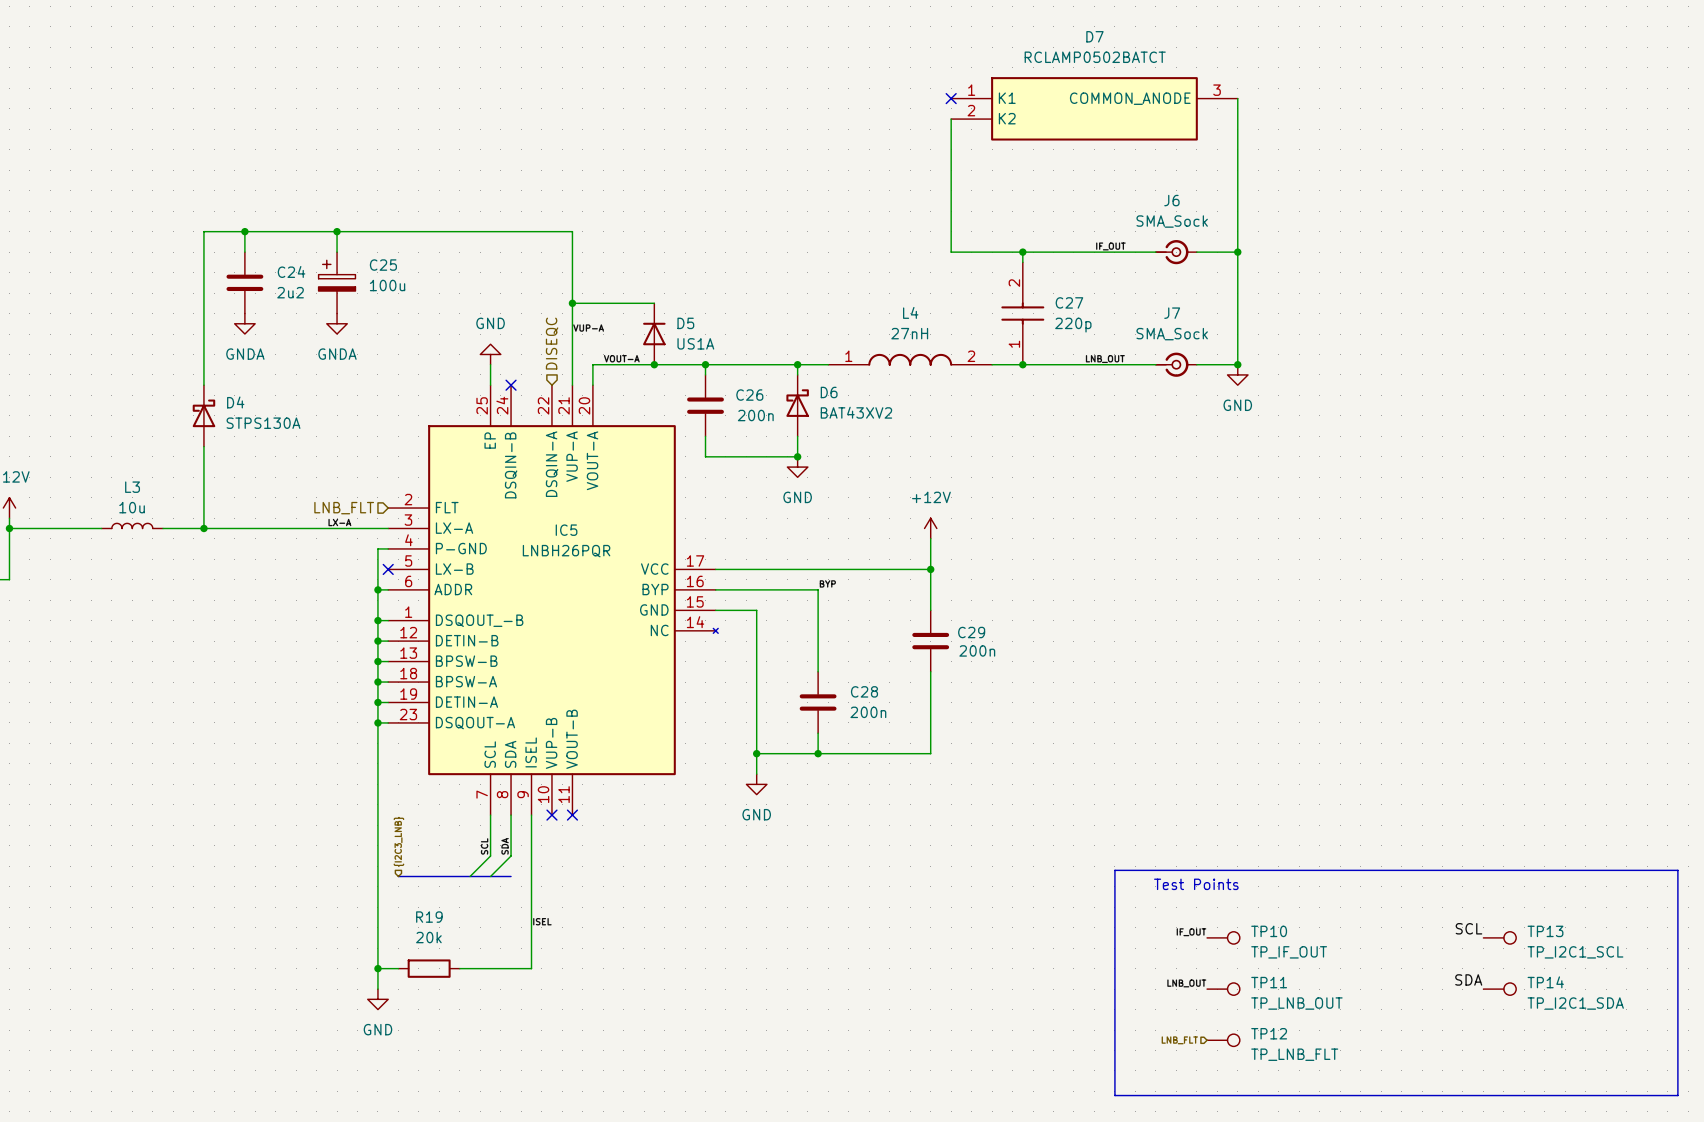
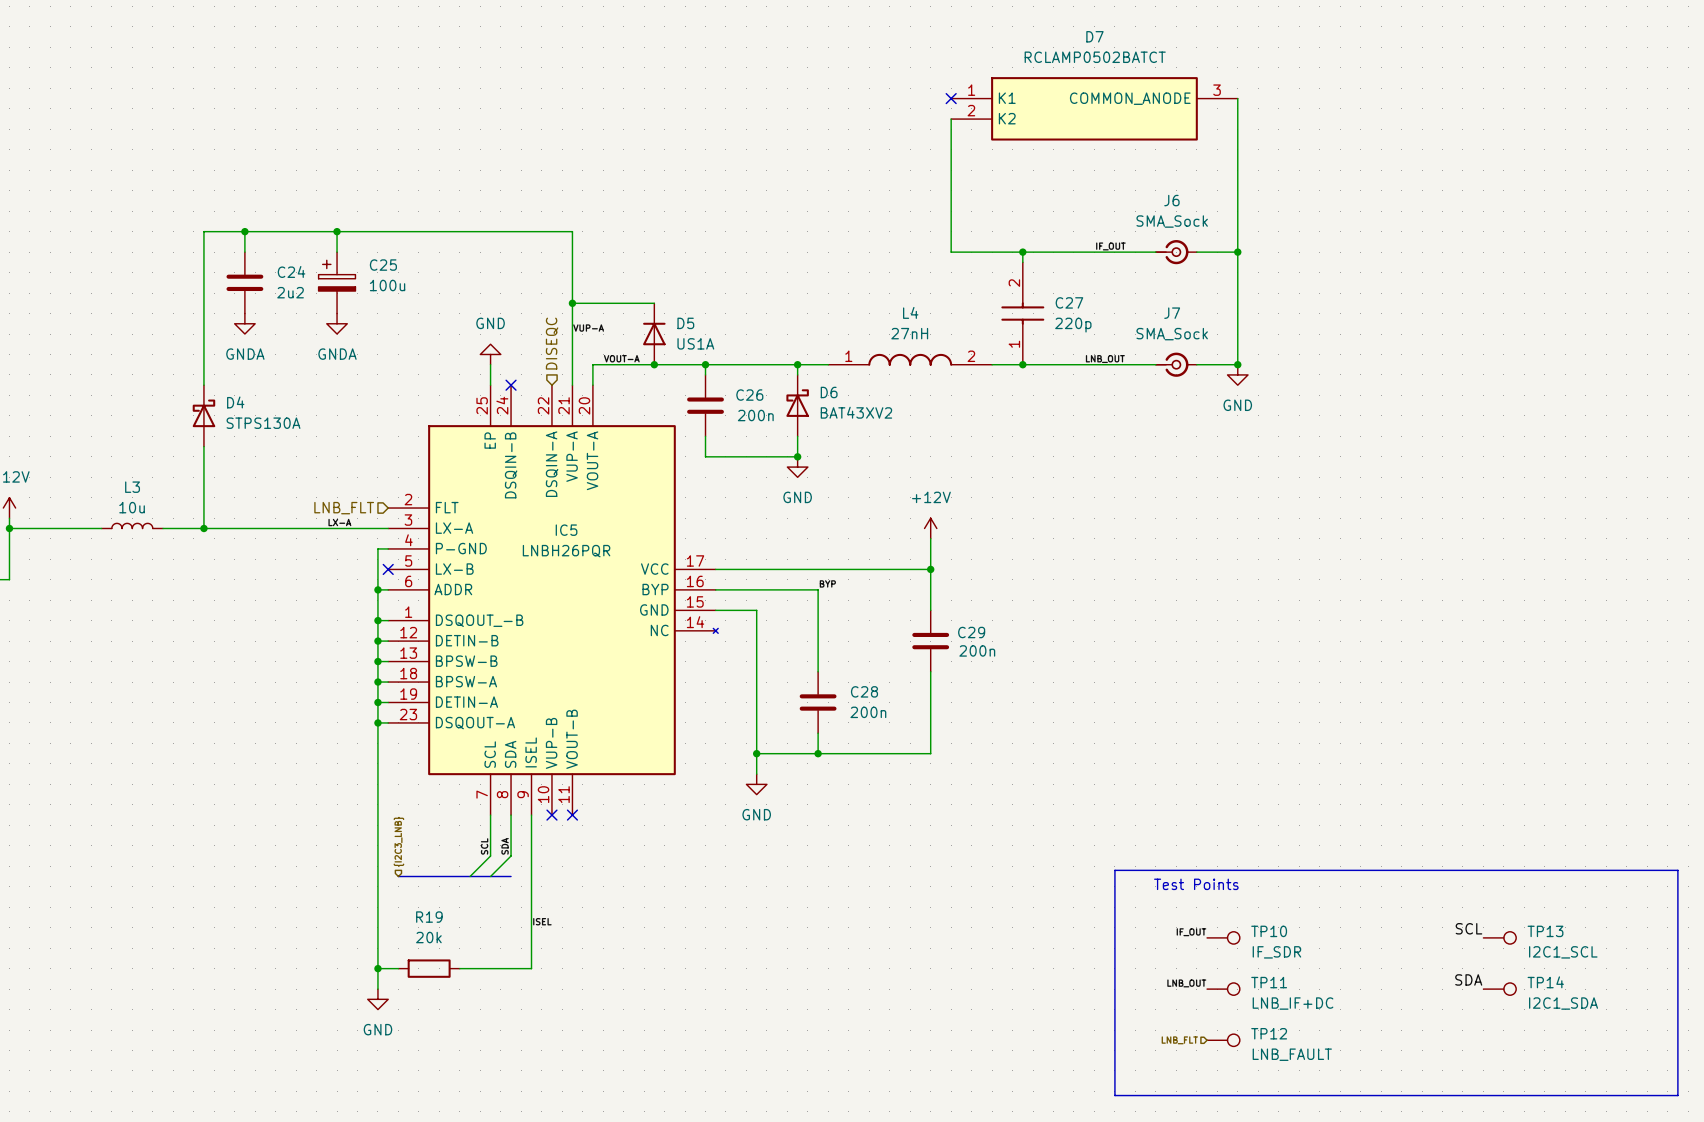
TP10 value: TP_IF_OUT (1289, 952) -> IF_SDR (1276, 952)
TP13 value: TP_I2C1_SCL (1575, 952) -> I2C1_SCL (1563, 952)
TP11 value: TP_LNB_OUT (1296, 1003) -> LNB_IF+DC (1293, 1003)
TP14 value: TP_I2C1_SDA (1575, 1003) -> I2C1_SDA (1563, 1003)
TP12 value: TP_LNB_FLT (1294, 1054) -> LNB_FAULT (1292, 1054)

